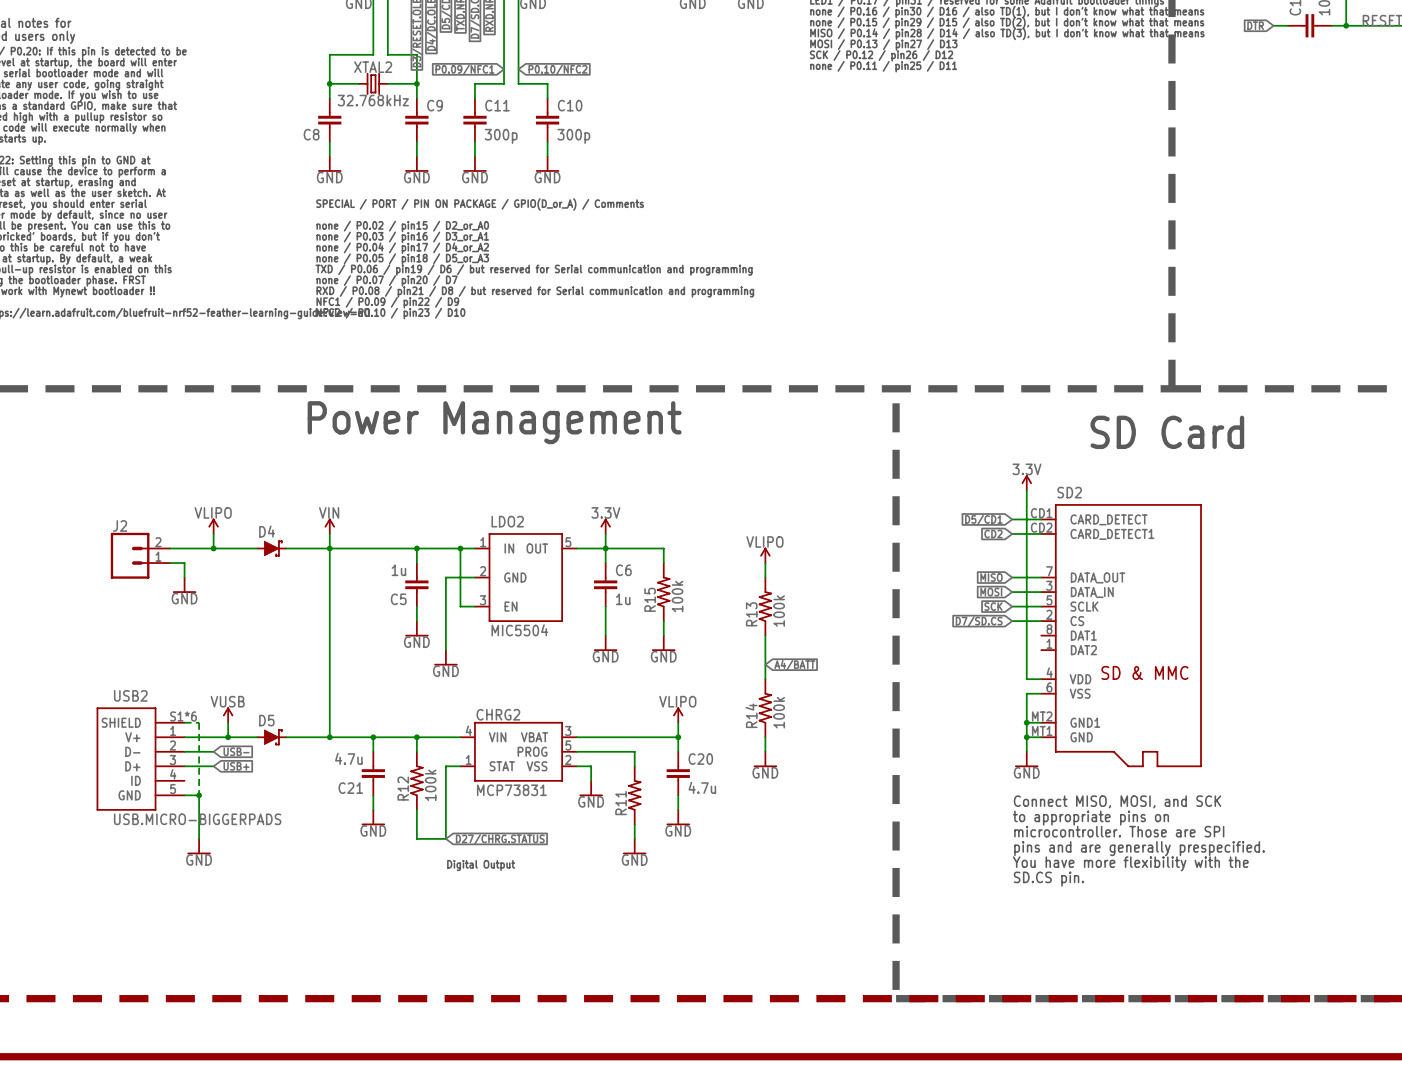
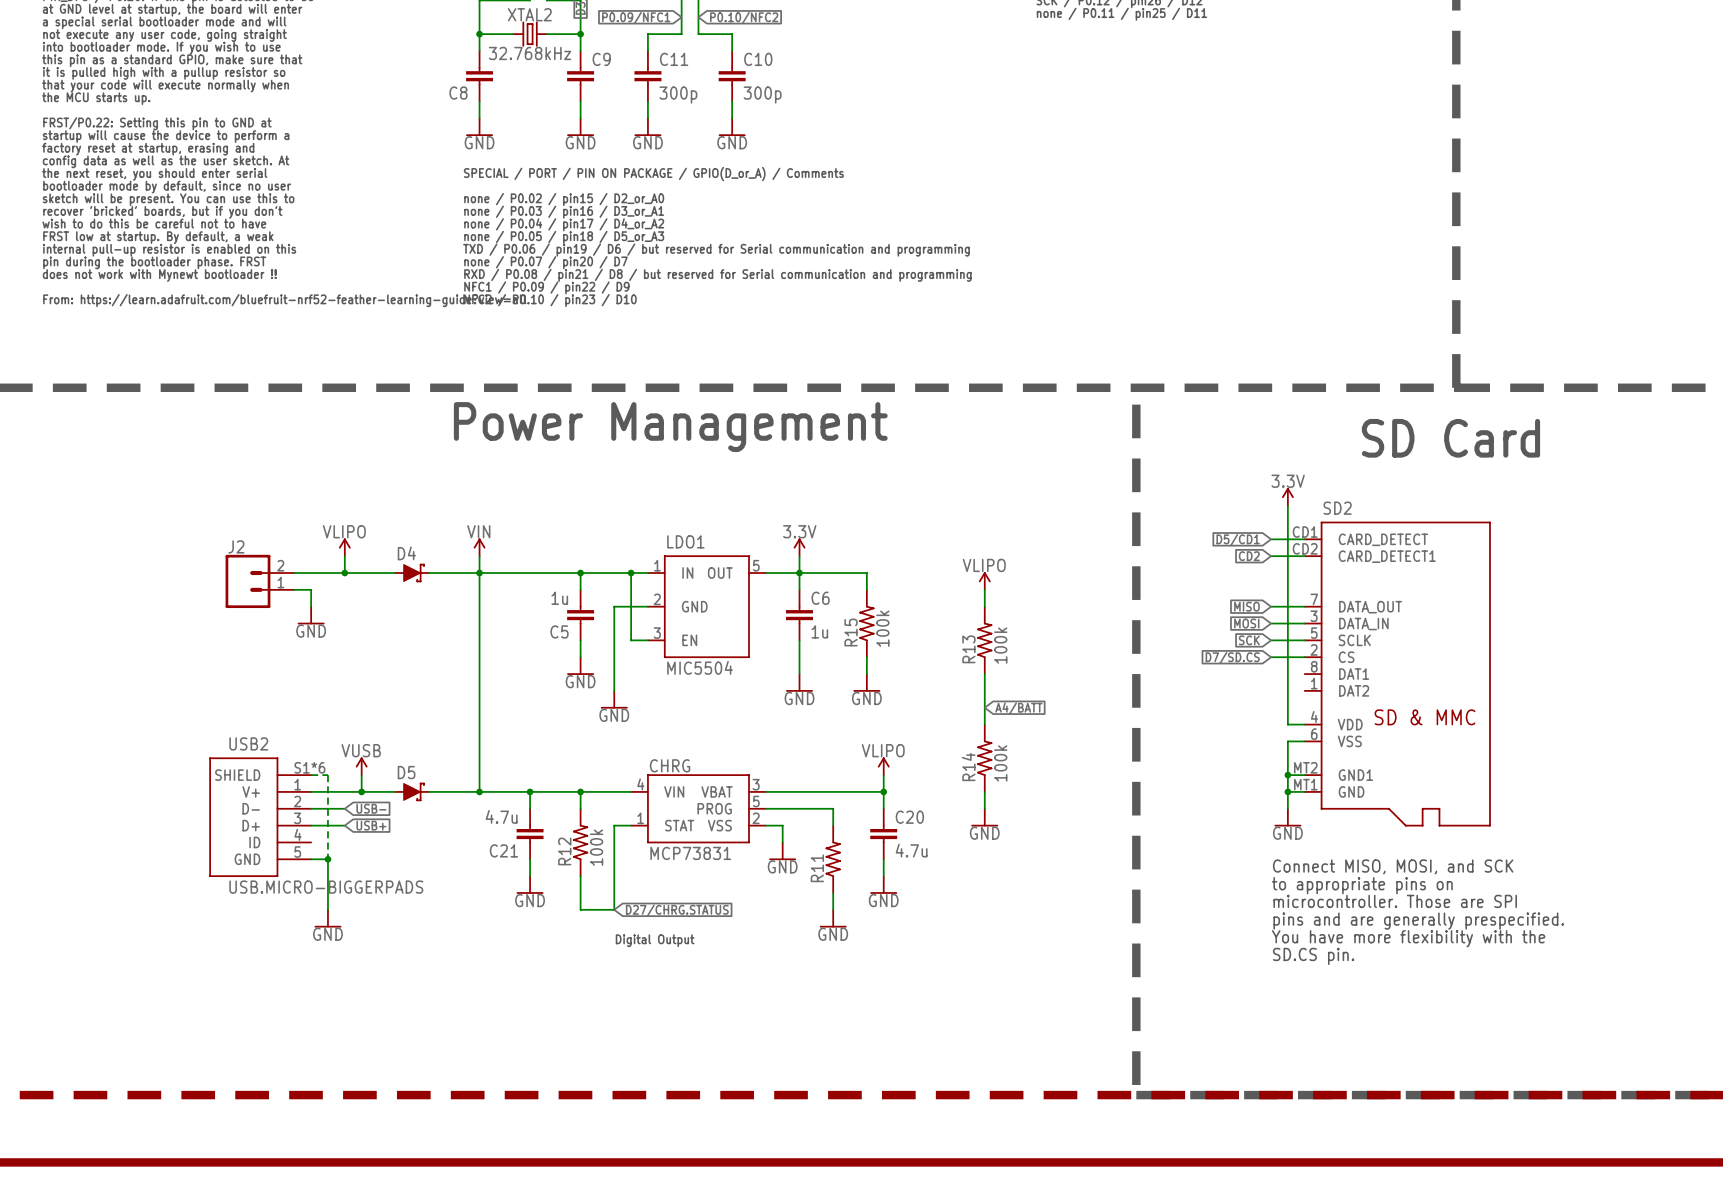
LDO2 name: LDO2 (507, 521) -> LDO1 (685, 541)
CHRG2 name: CHRG2 (498, 714) -> CHRG (670, 765)

